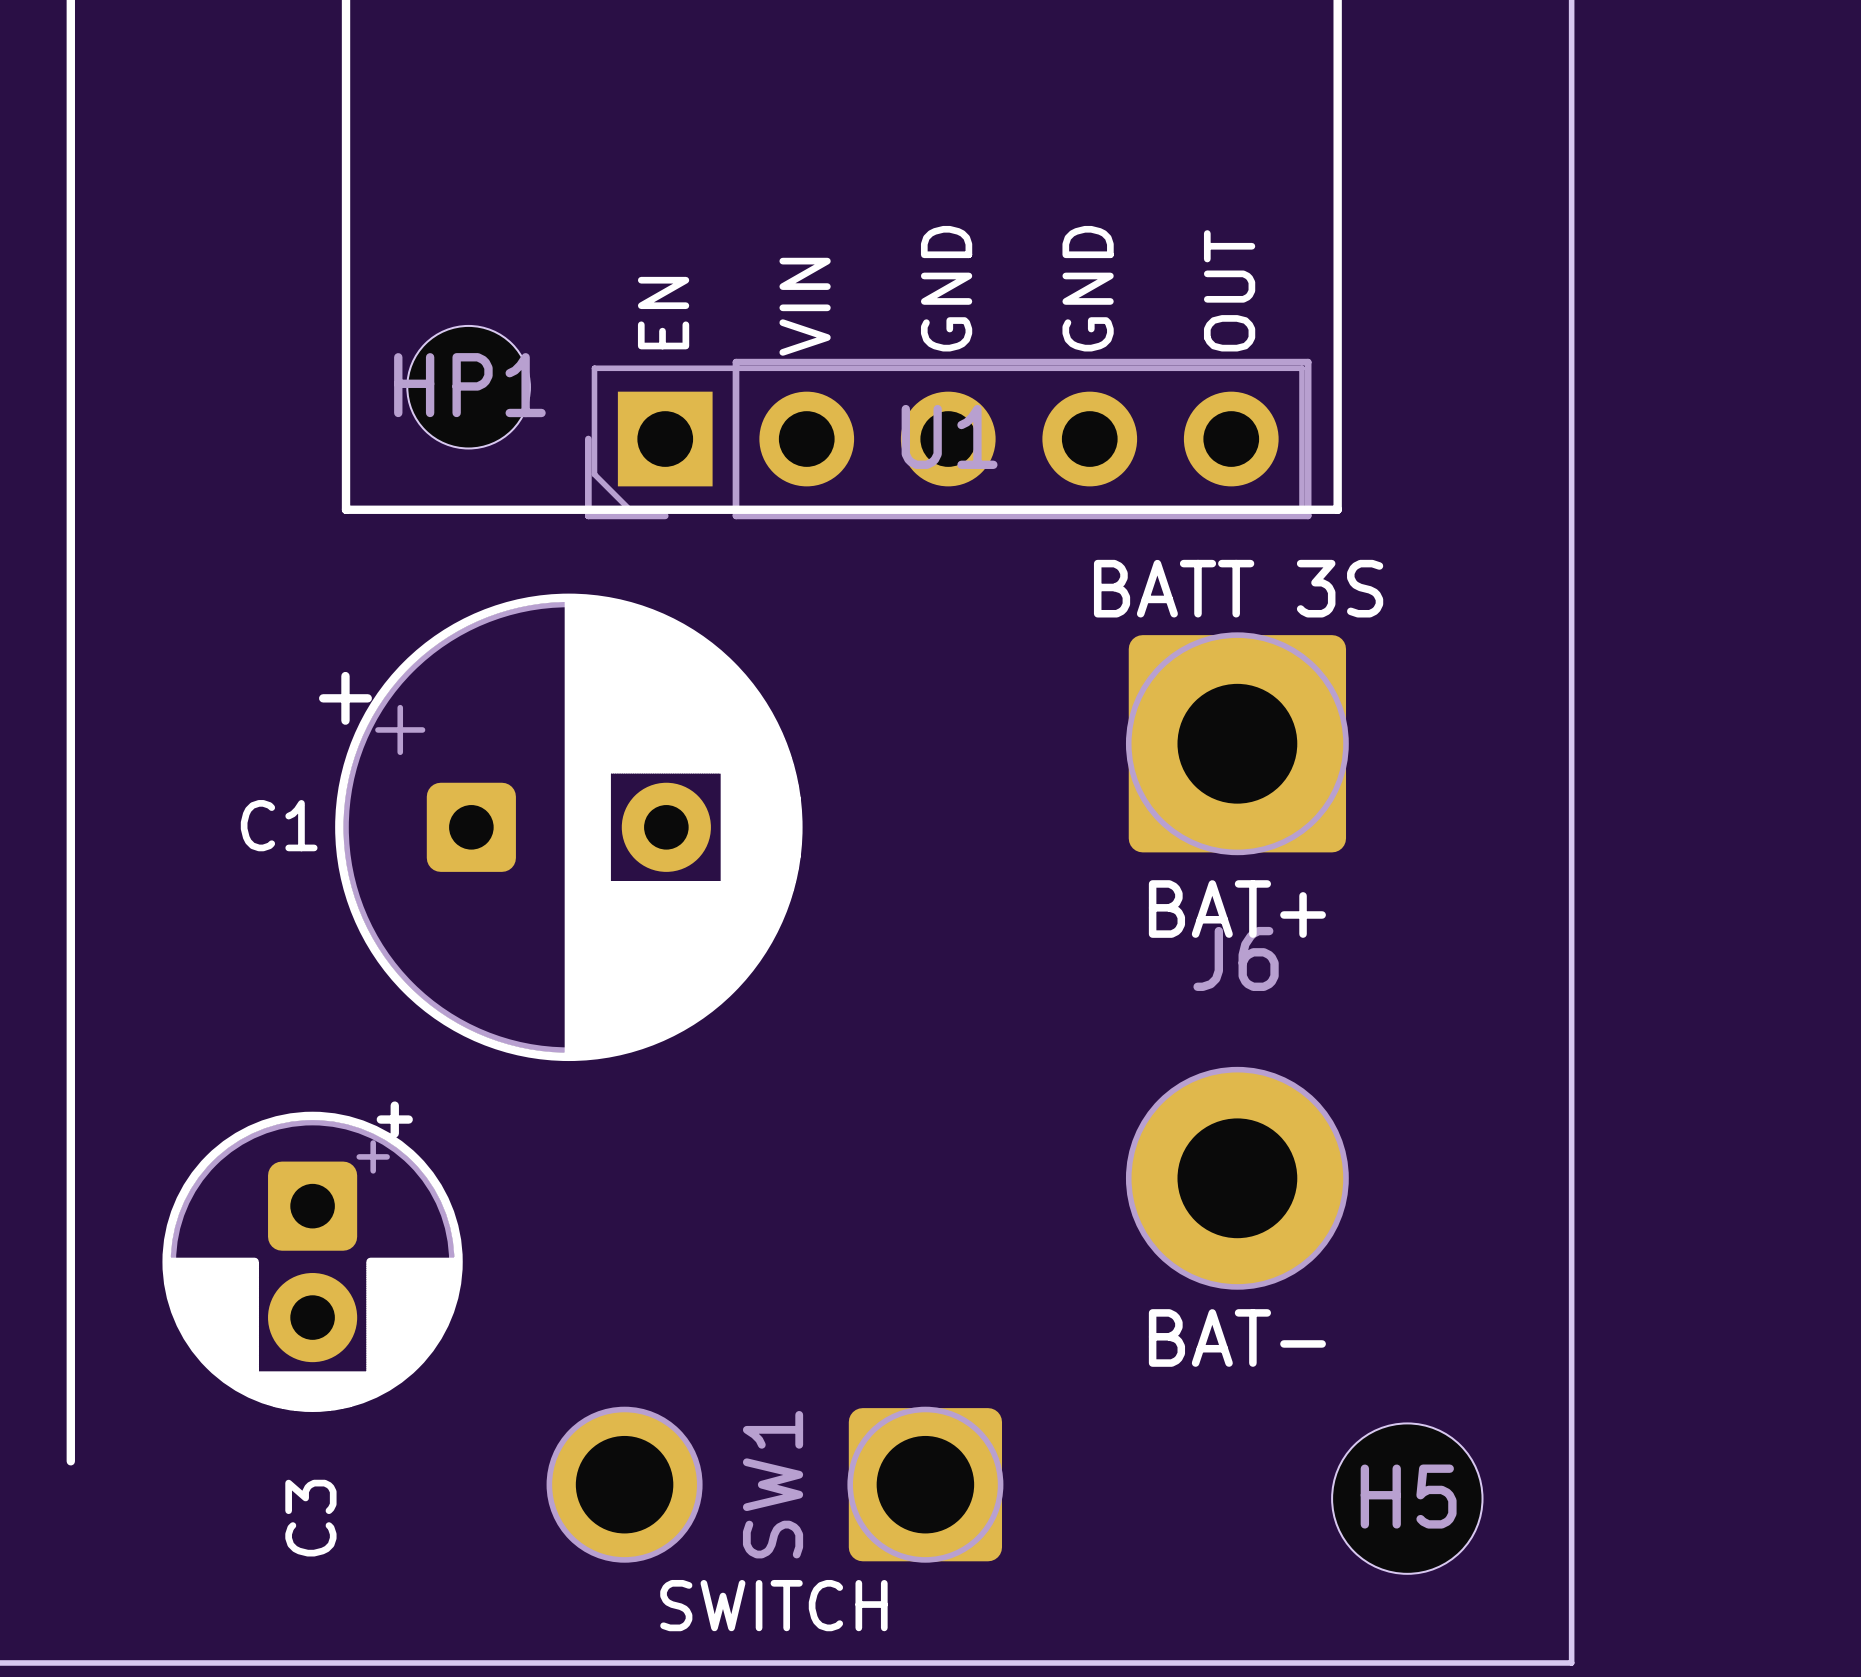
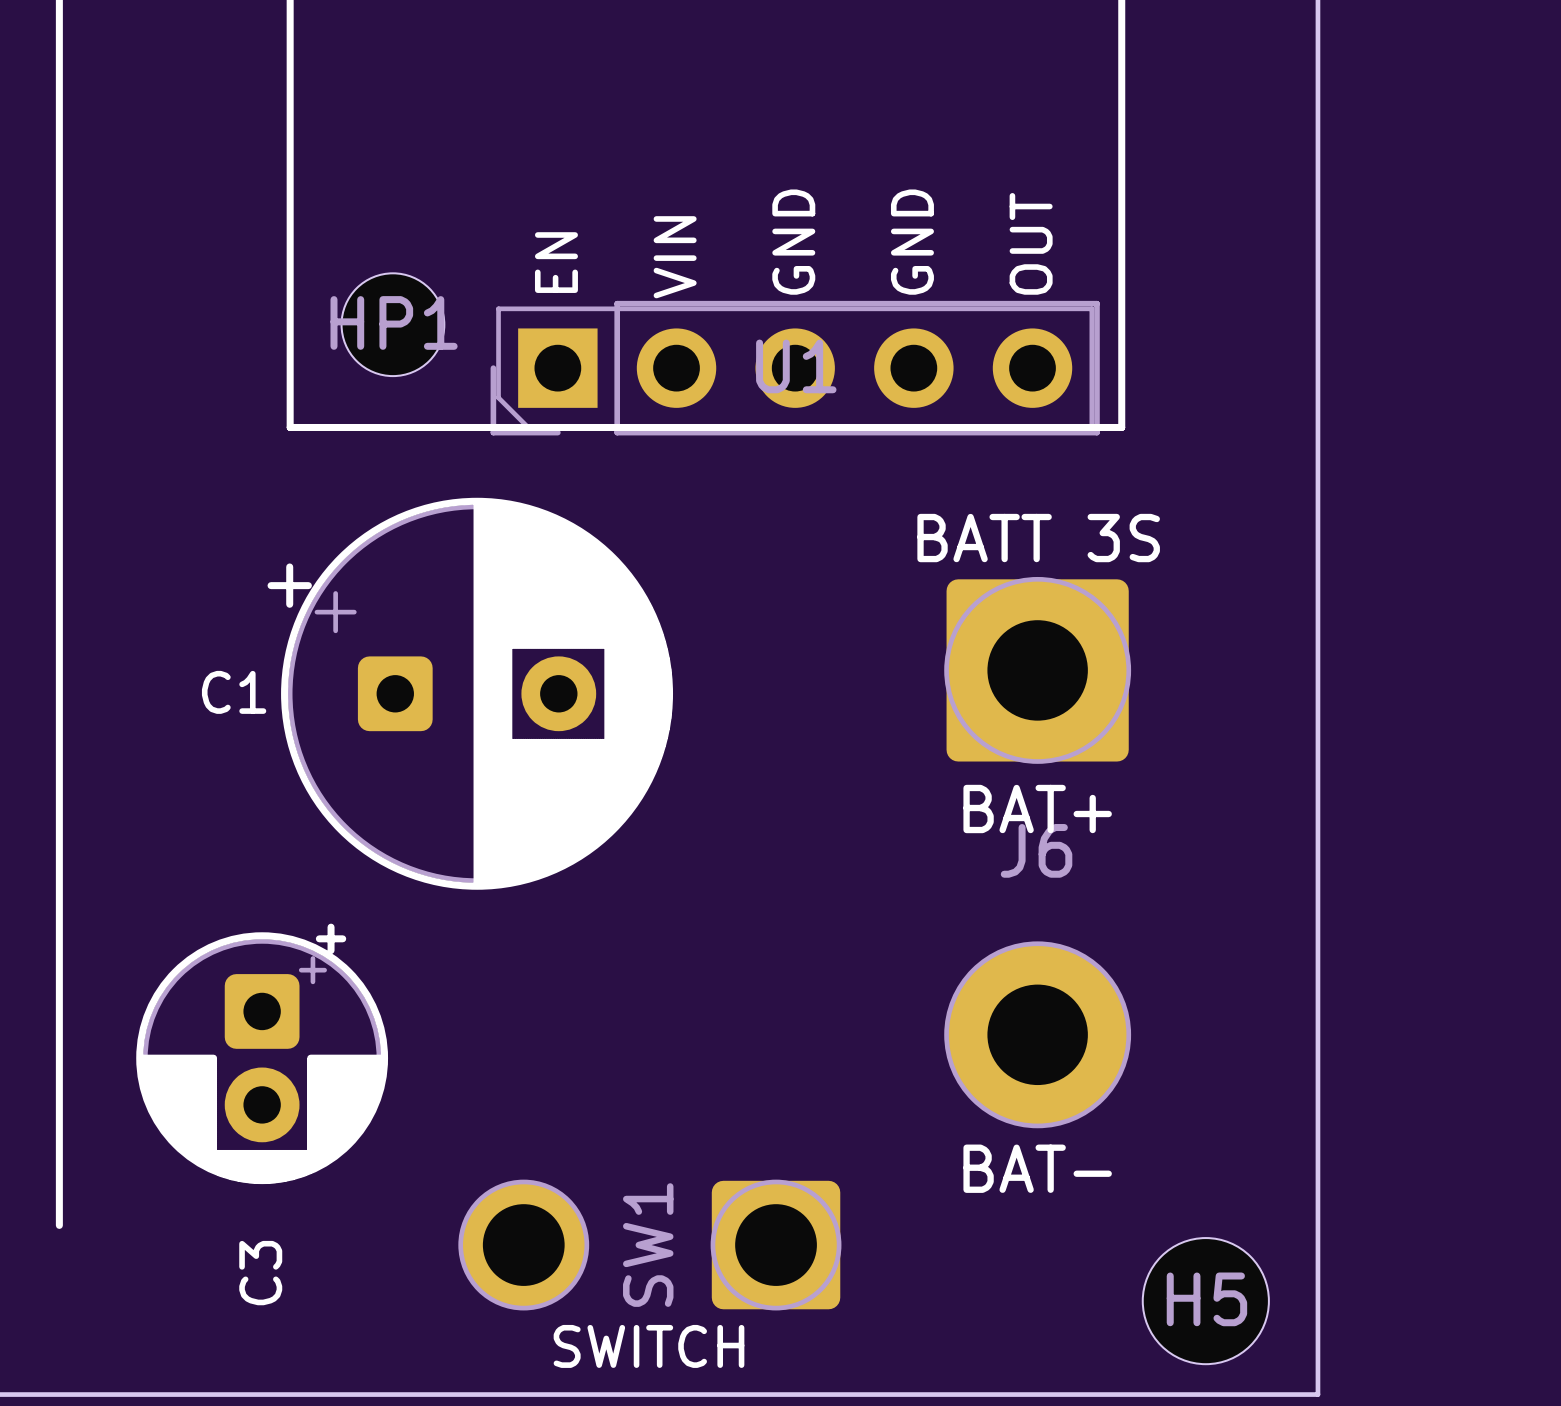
text position: BATT 3S (1238, 588) -> BATT 3S (1038, 538)
text position: BAT+ (1237, 909) -> BAT+ (1037, 809)
J6 position: (1237, 961) -> (1037, 852)
text position: BAT- (1237, 1337) -> BAT- (1037, 1168)
H5 position: (1407, 1498) -> (1205, 1301)

